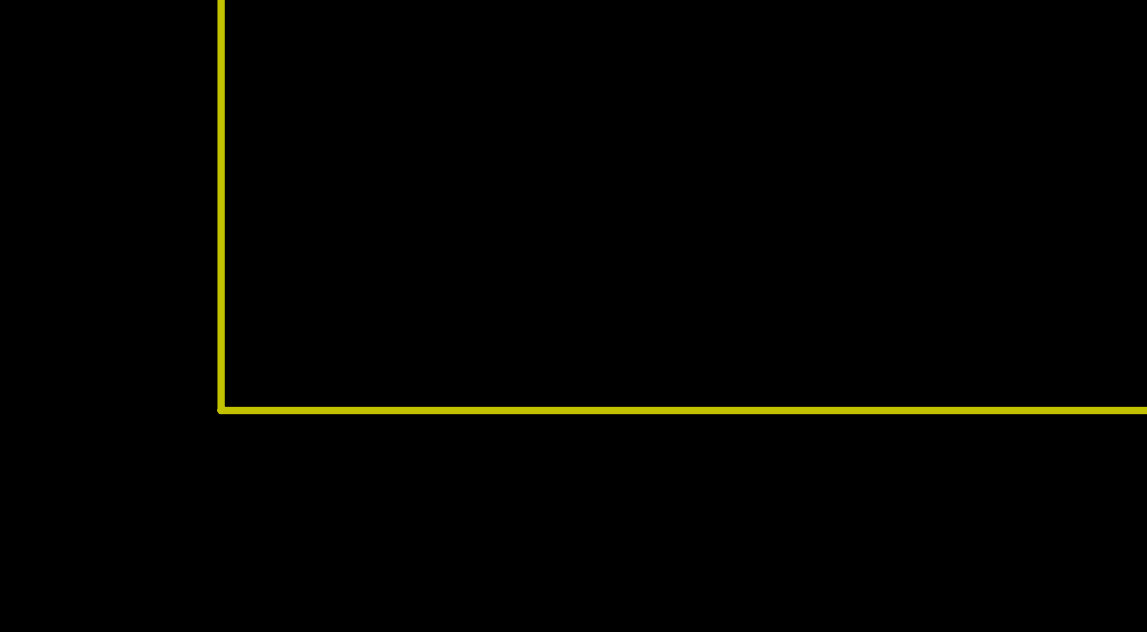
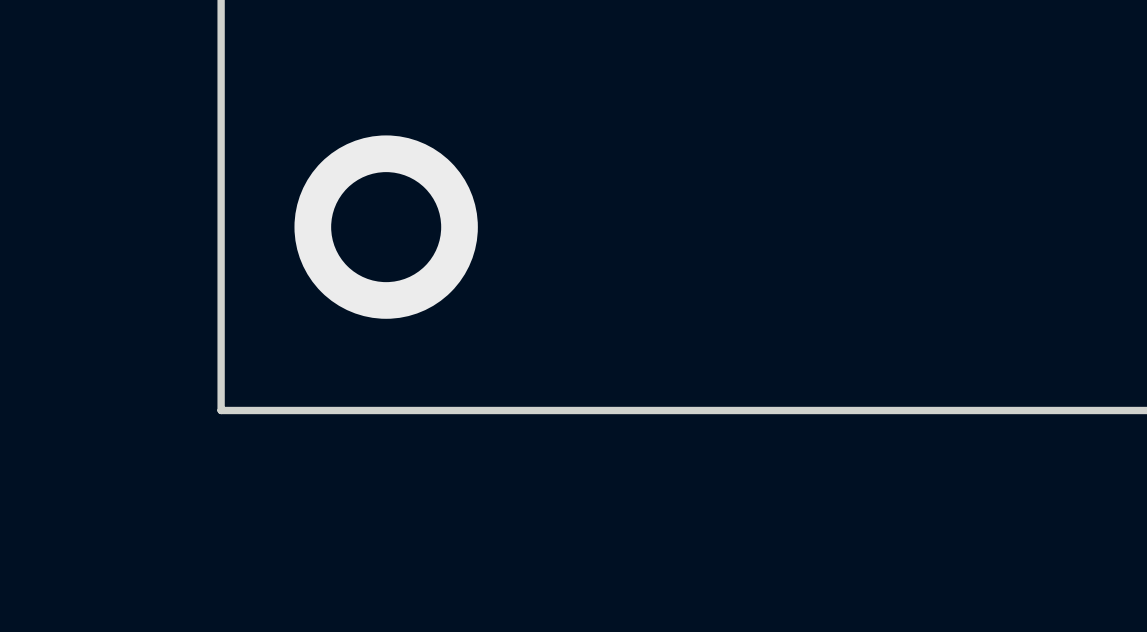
via: none -> (386, 227)

